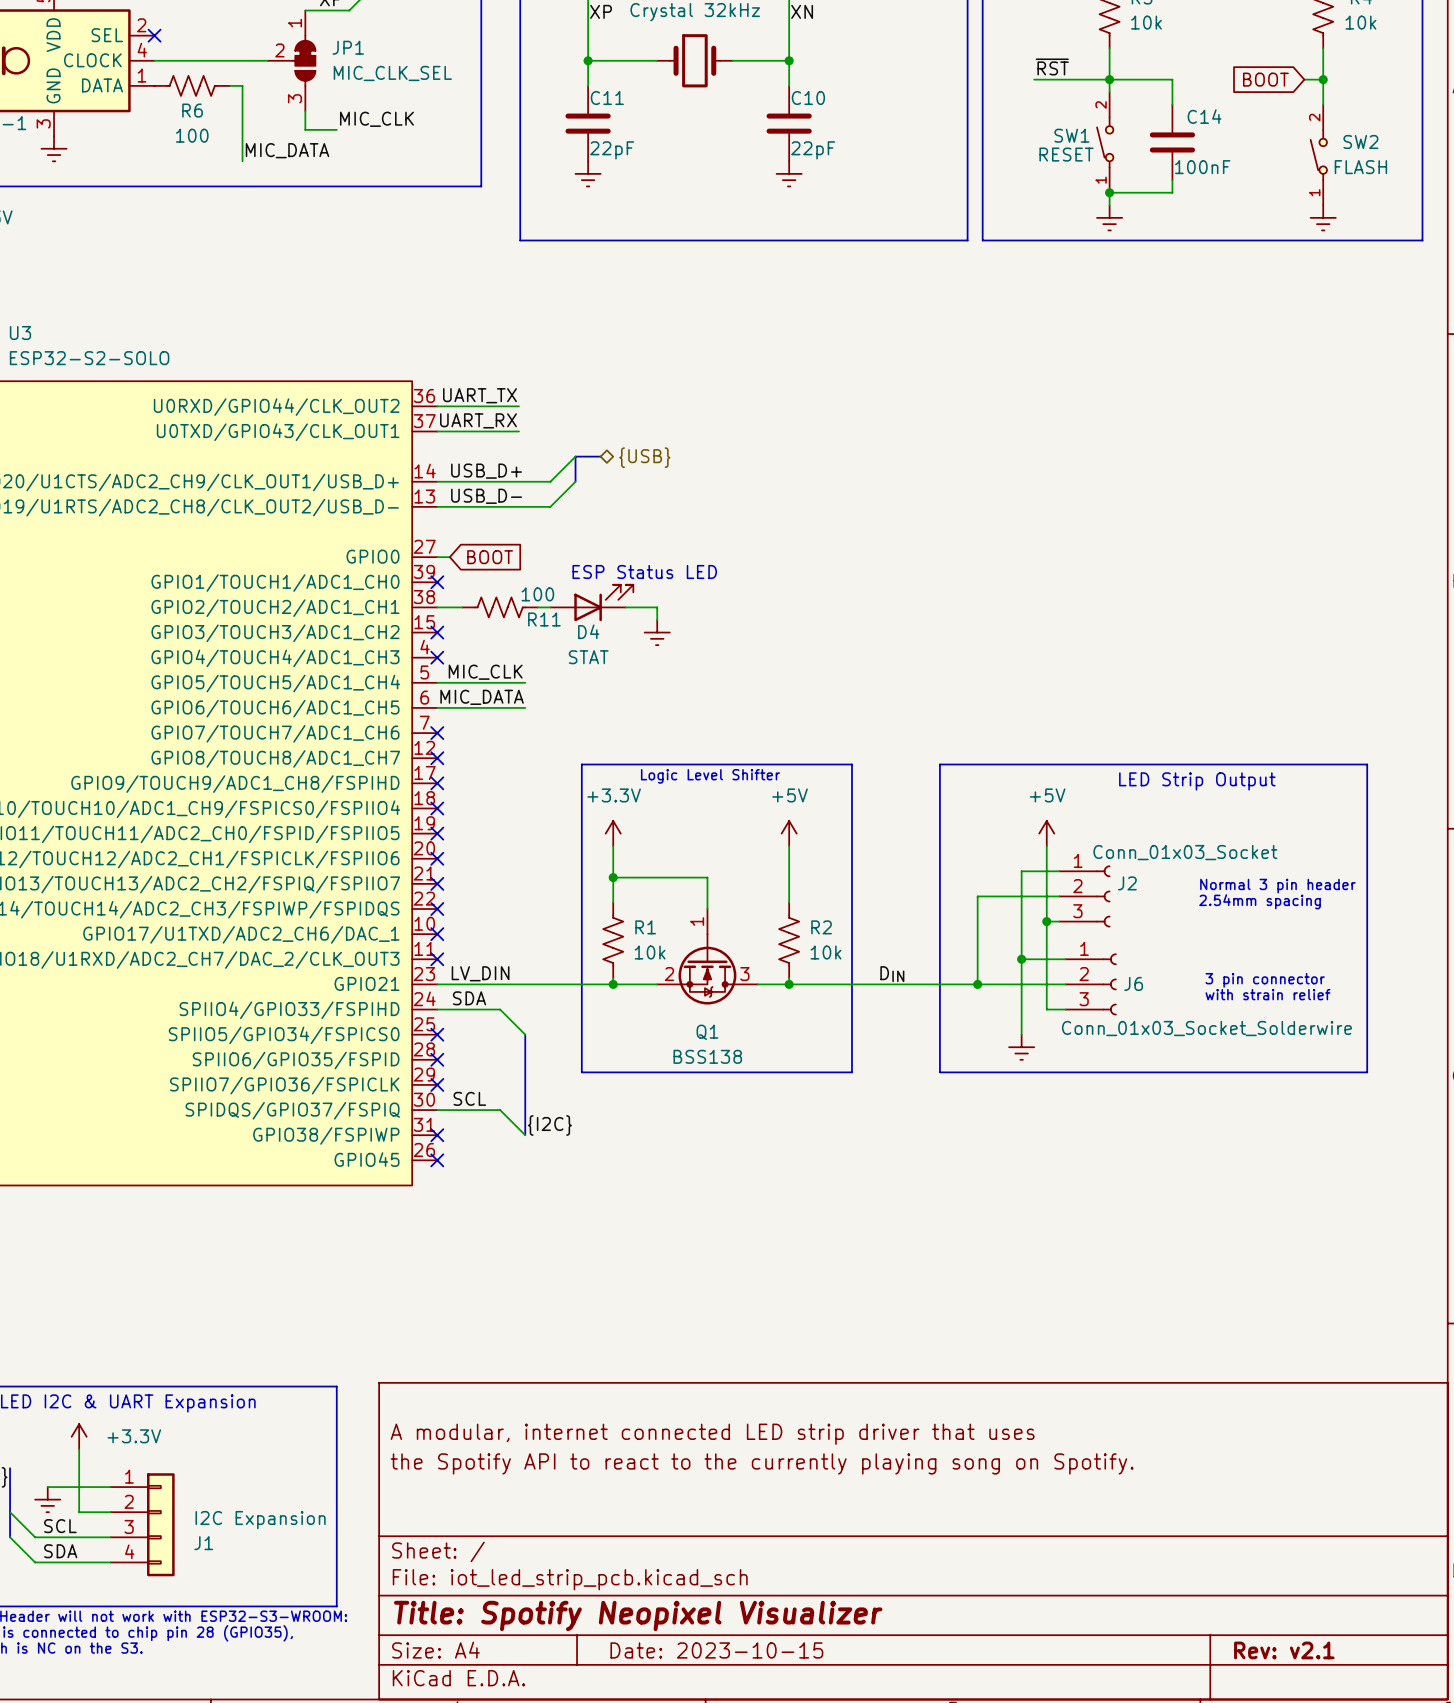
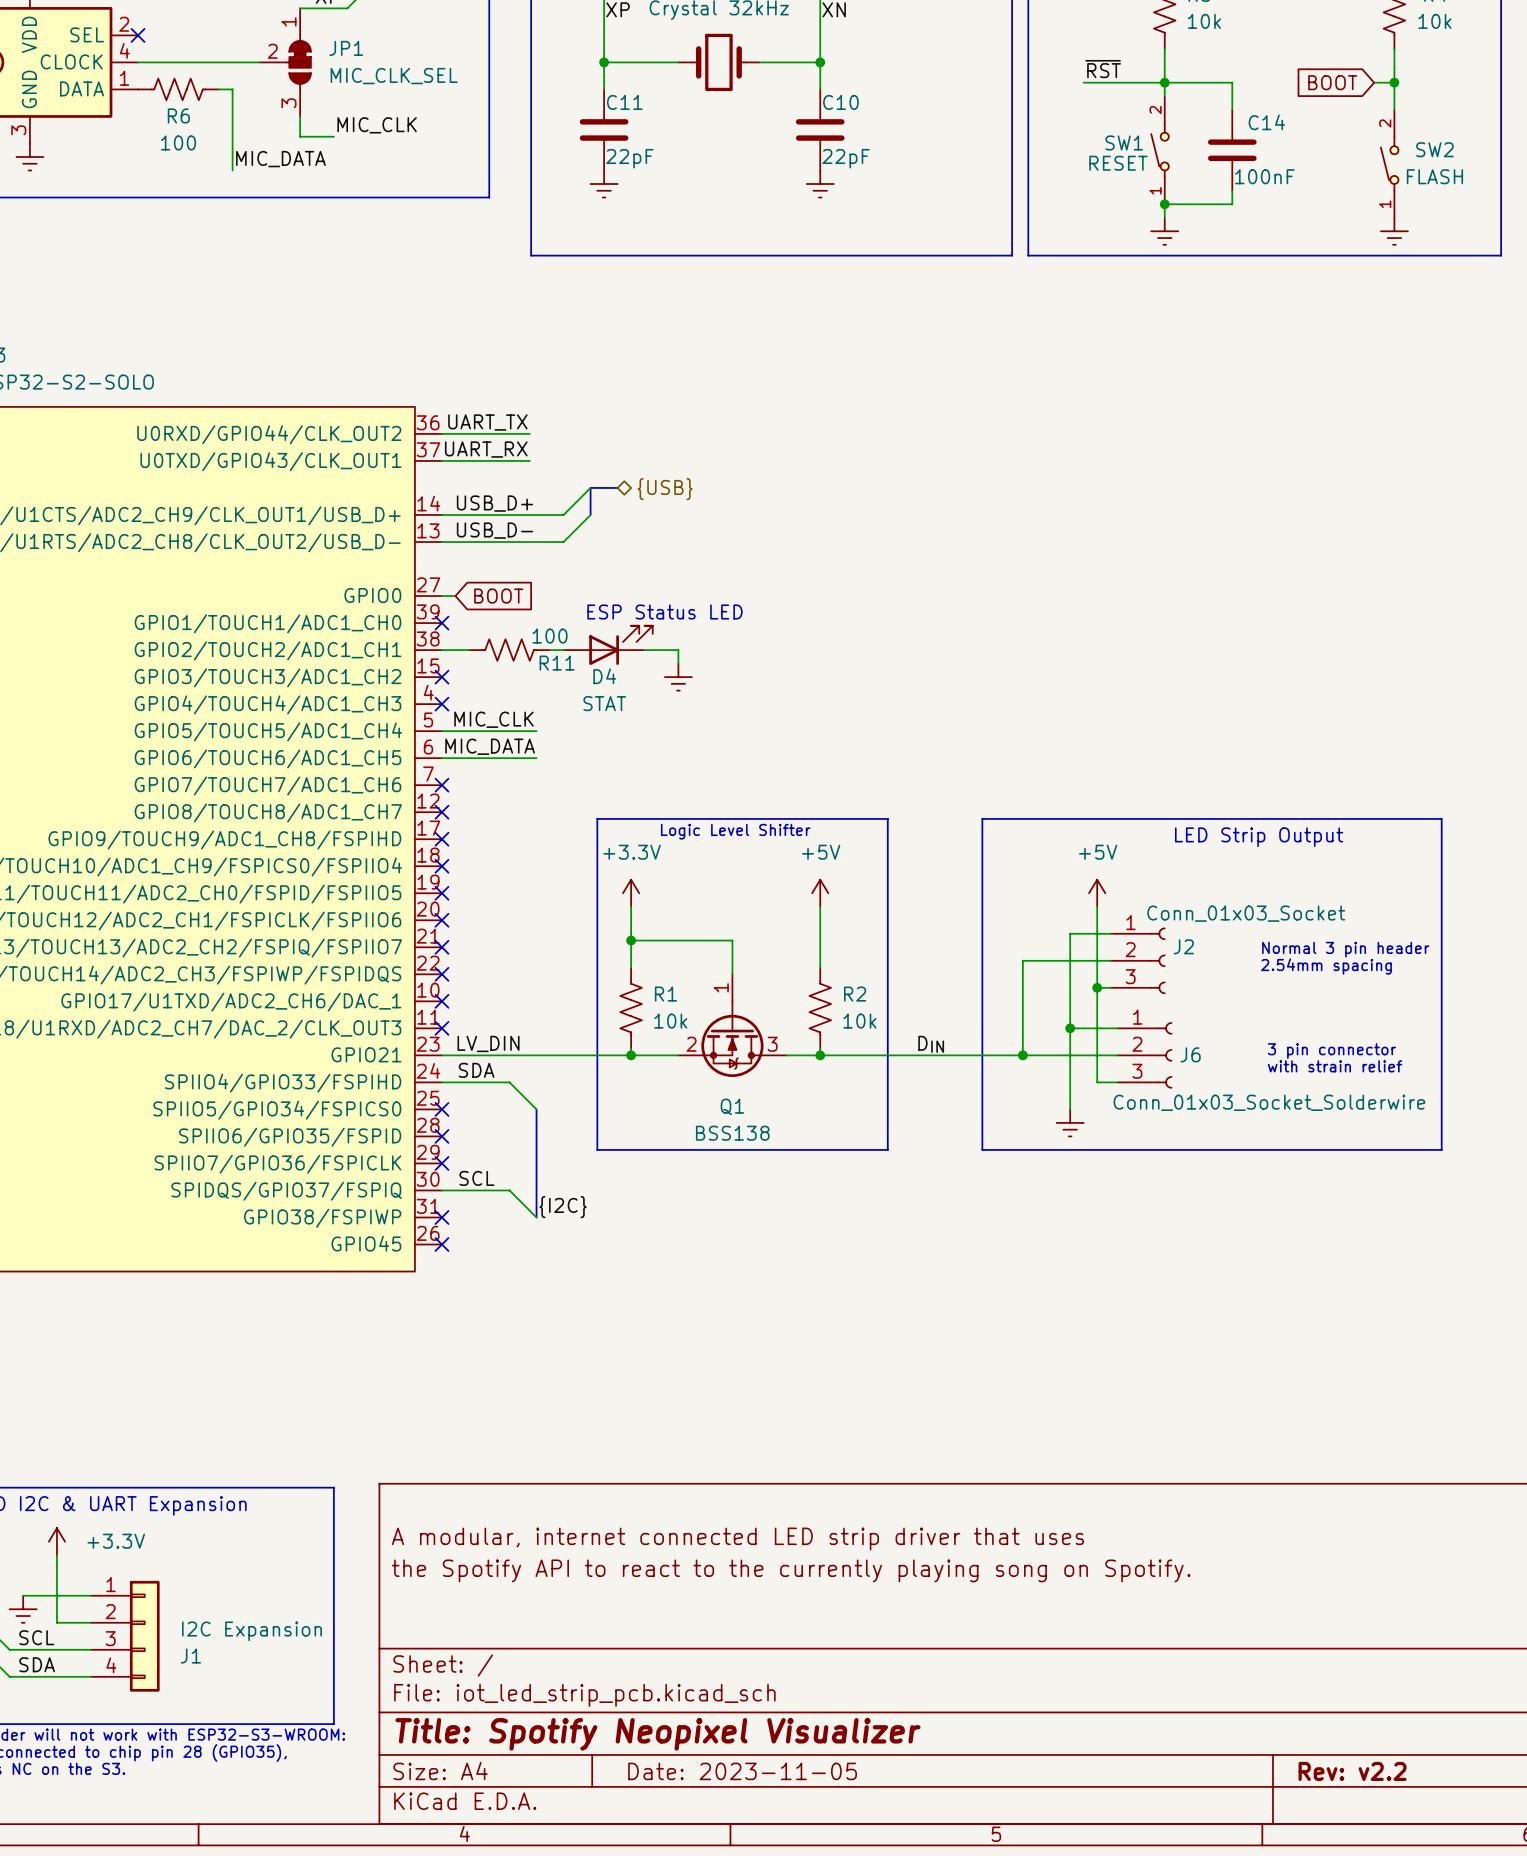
title block: Date: 2023-10-15 (716, 1650) -> Date: 2023-11-05 (742, 1771)
title block: Rev: v2.1 (1284, 1650) -> Rev: v2.2 (1352, 1771)

